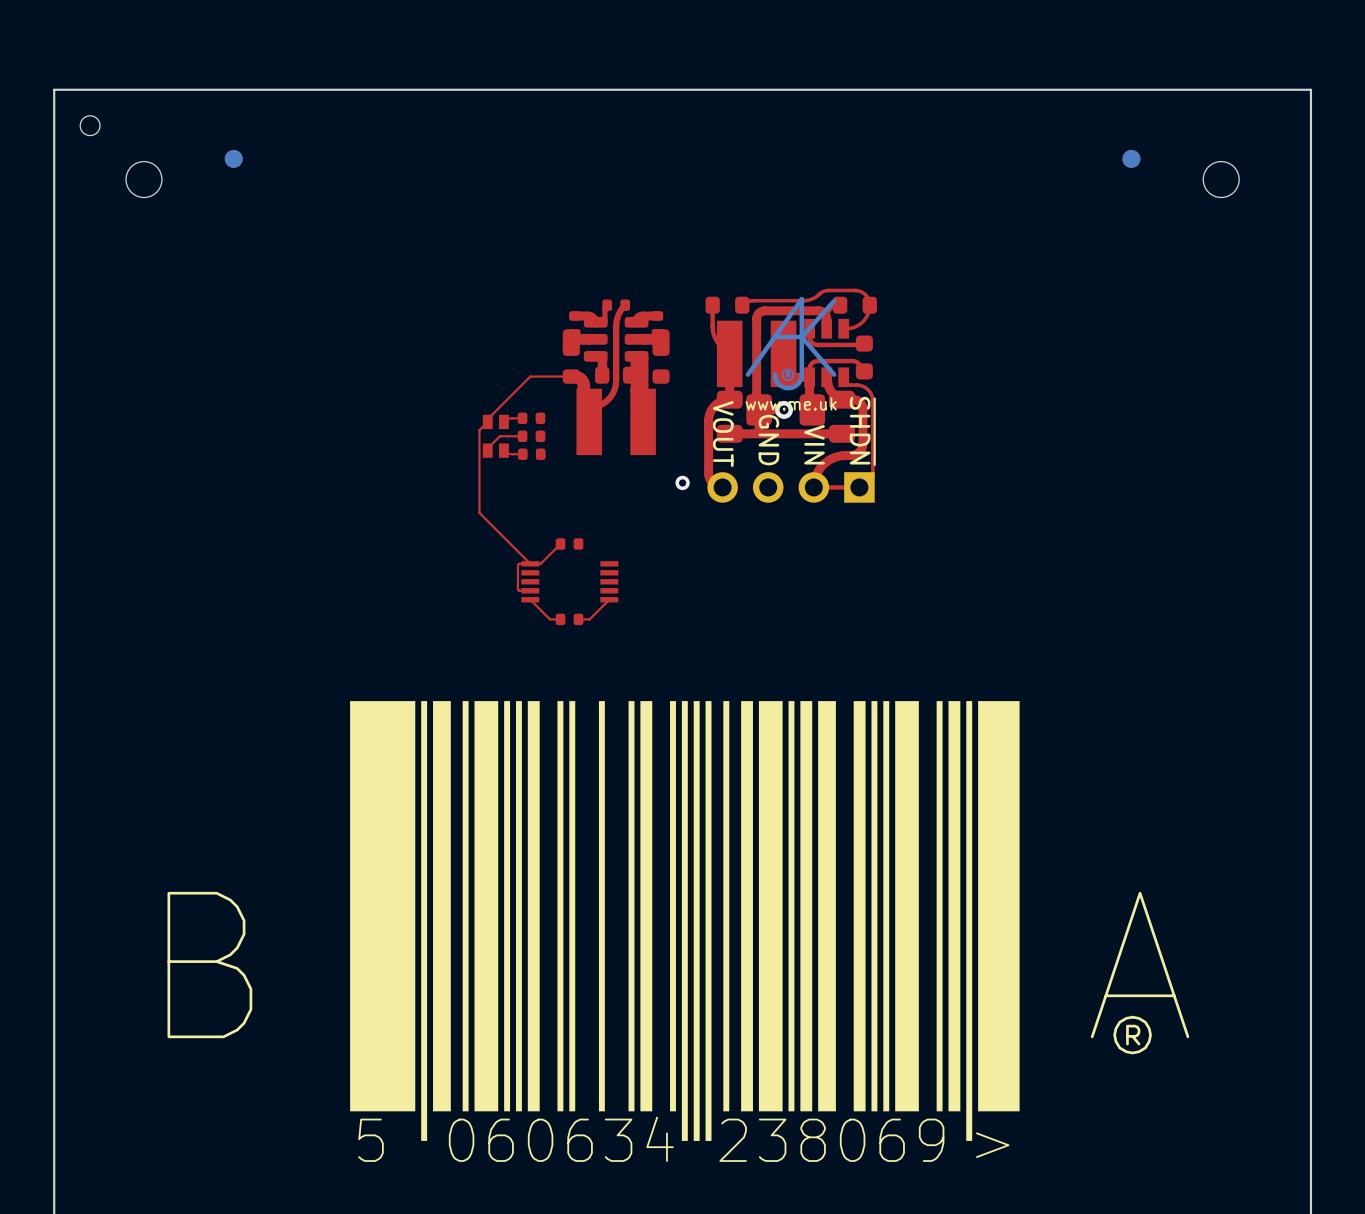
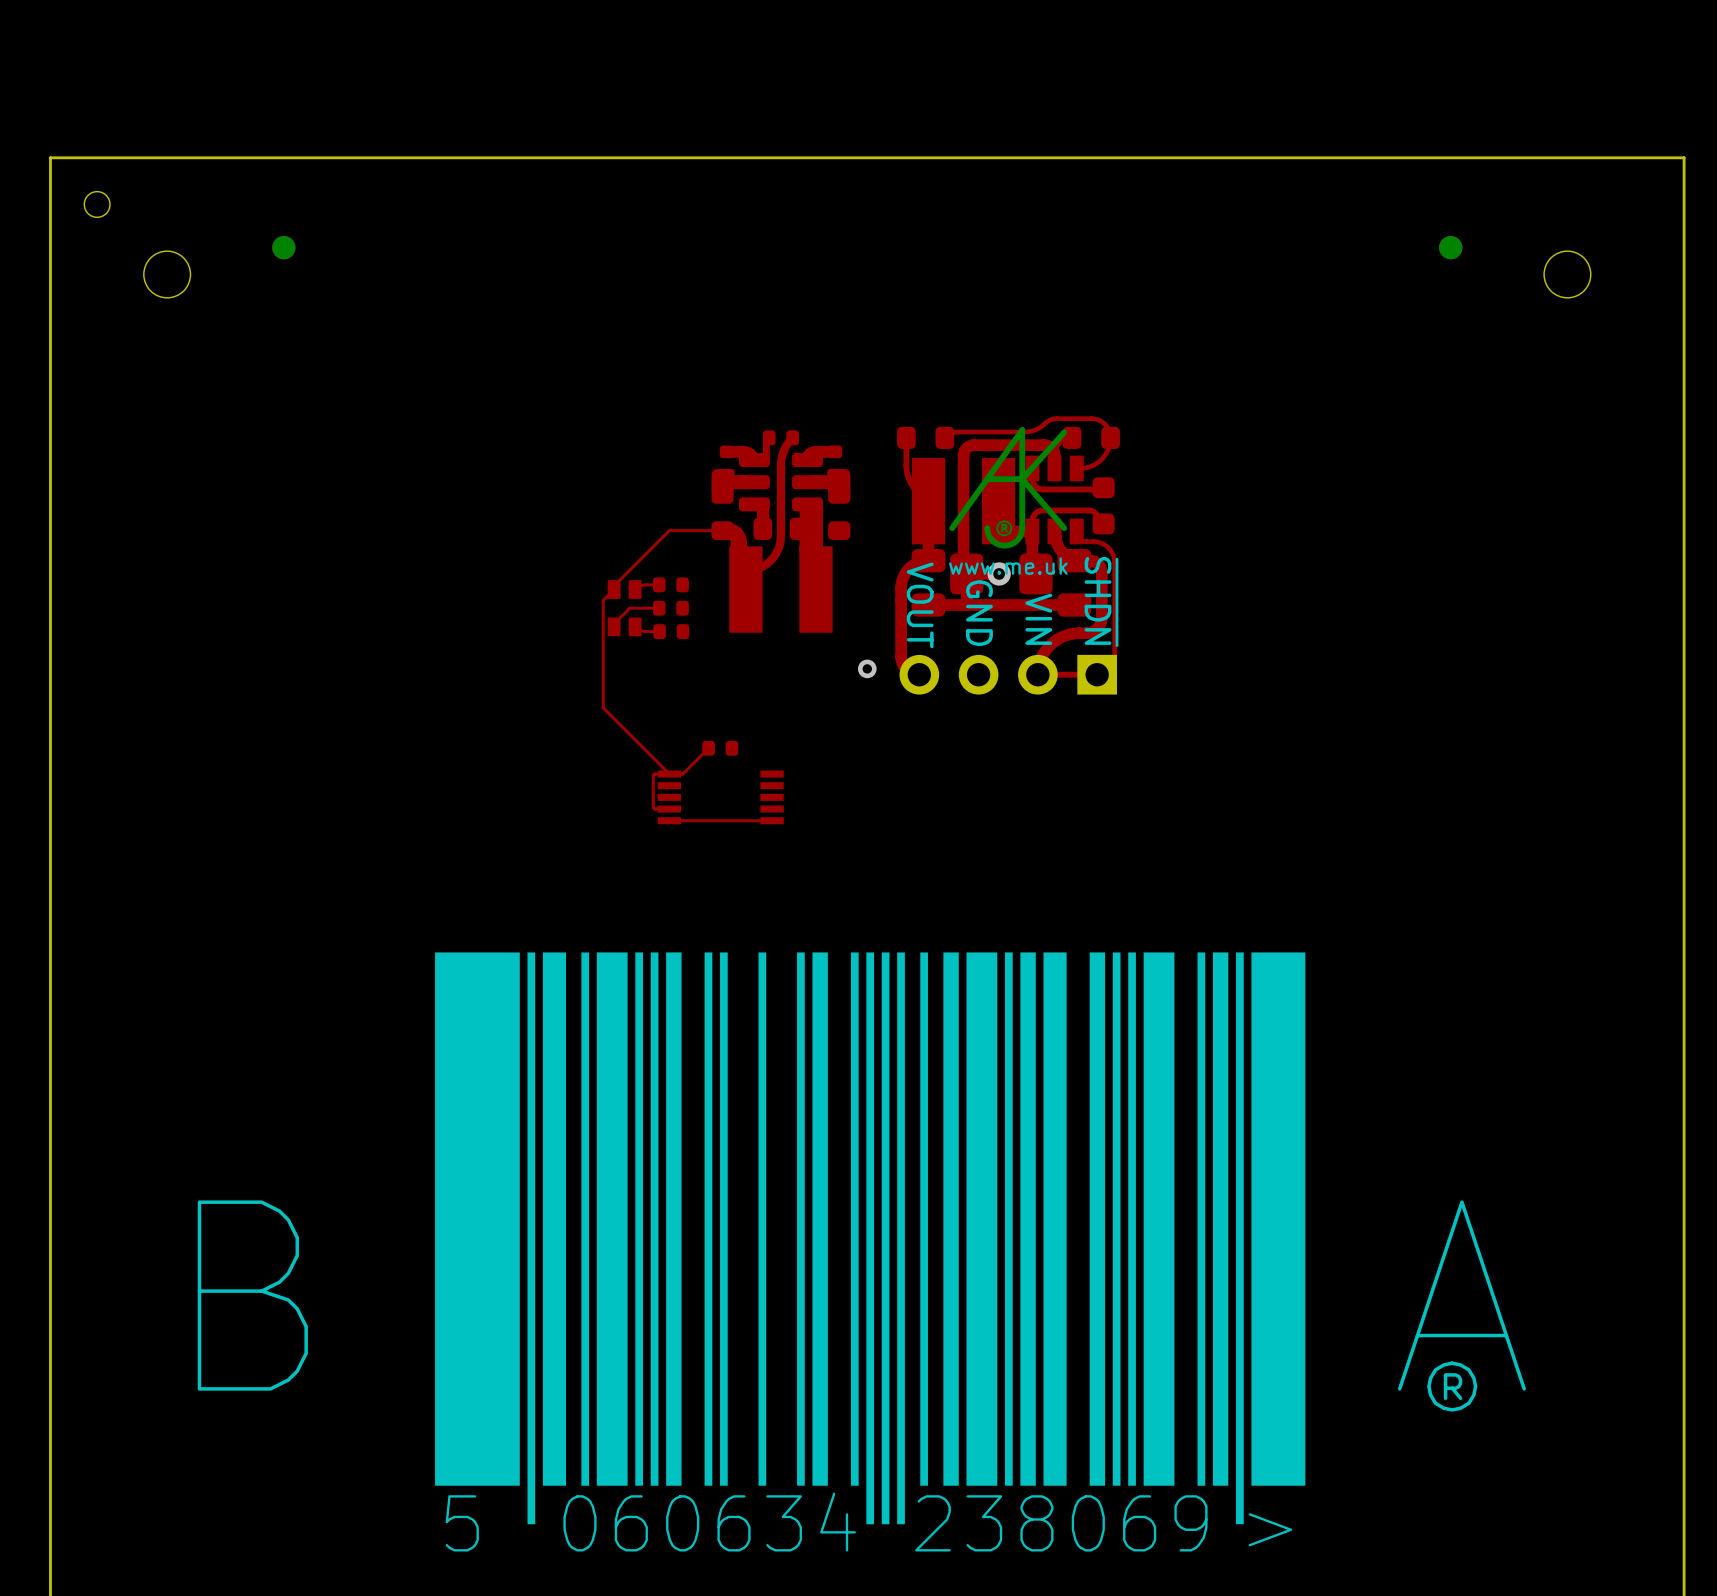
top track: (530, 599) (550, 619) (560, 619) -> none
top track: (609, 599) (589, 619) (578, 619) -> (772, 820) (669, 820)
part: (569, 619) -> none

